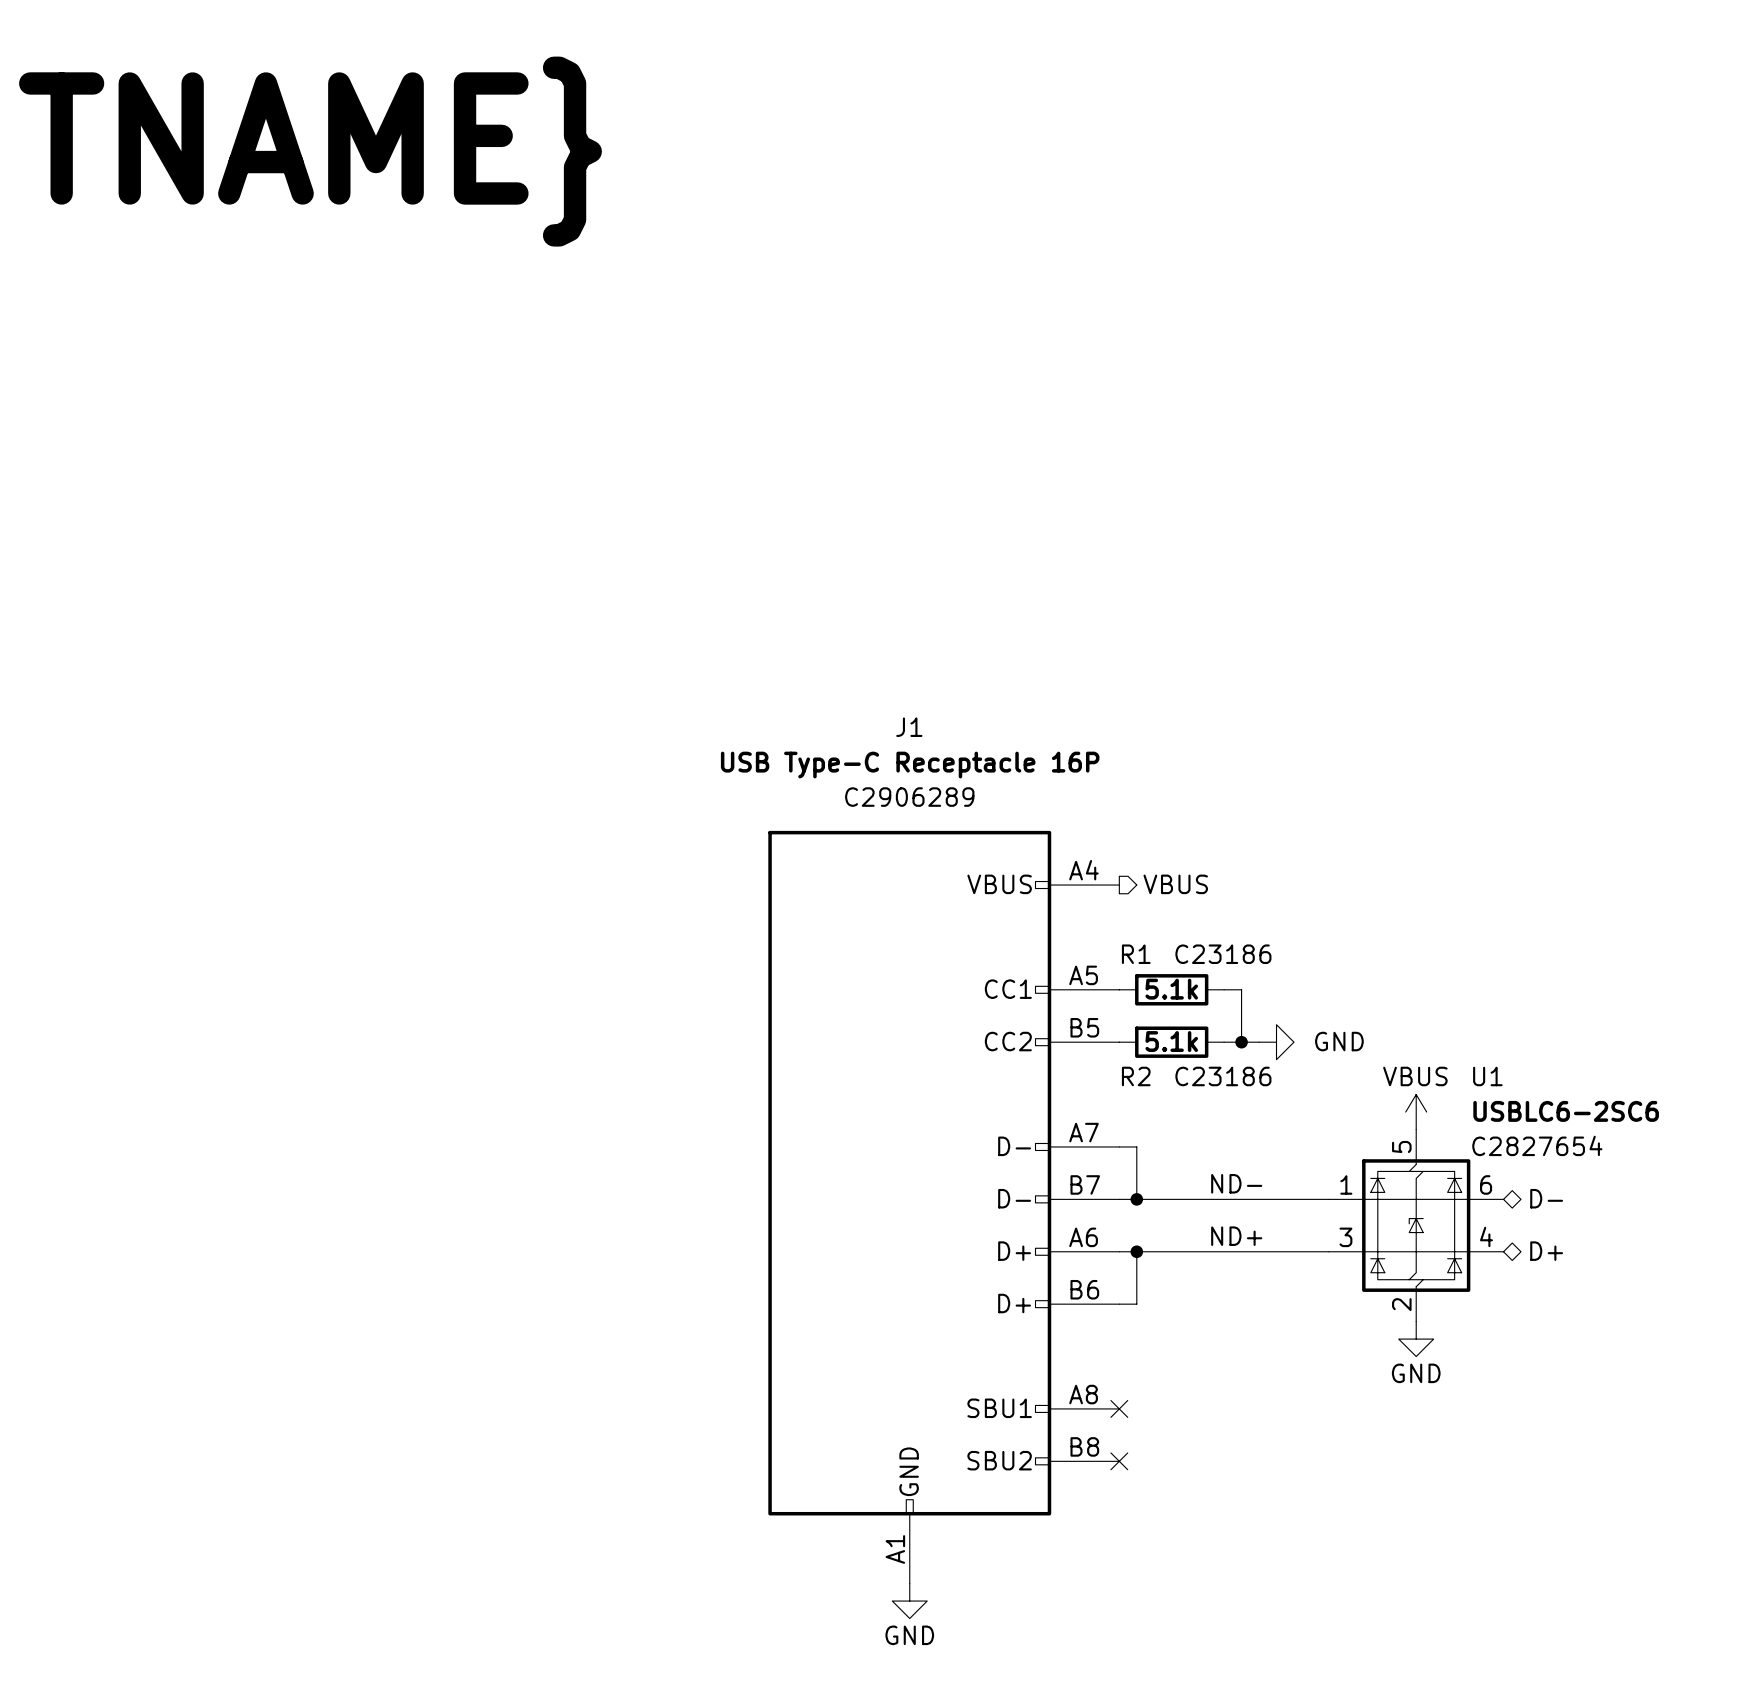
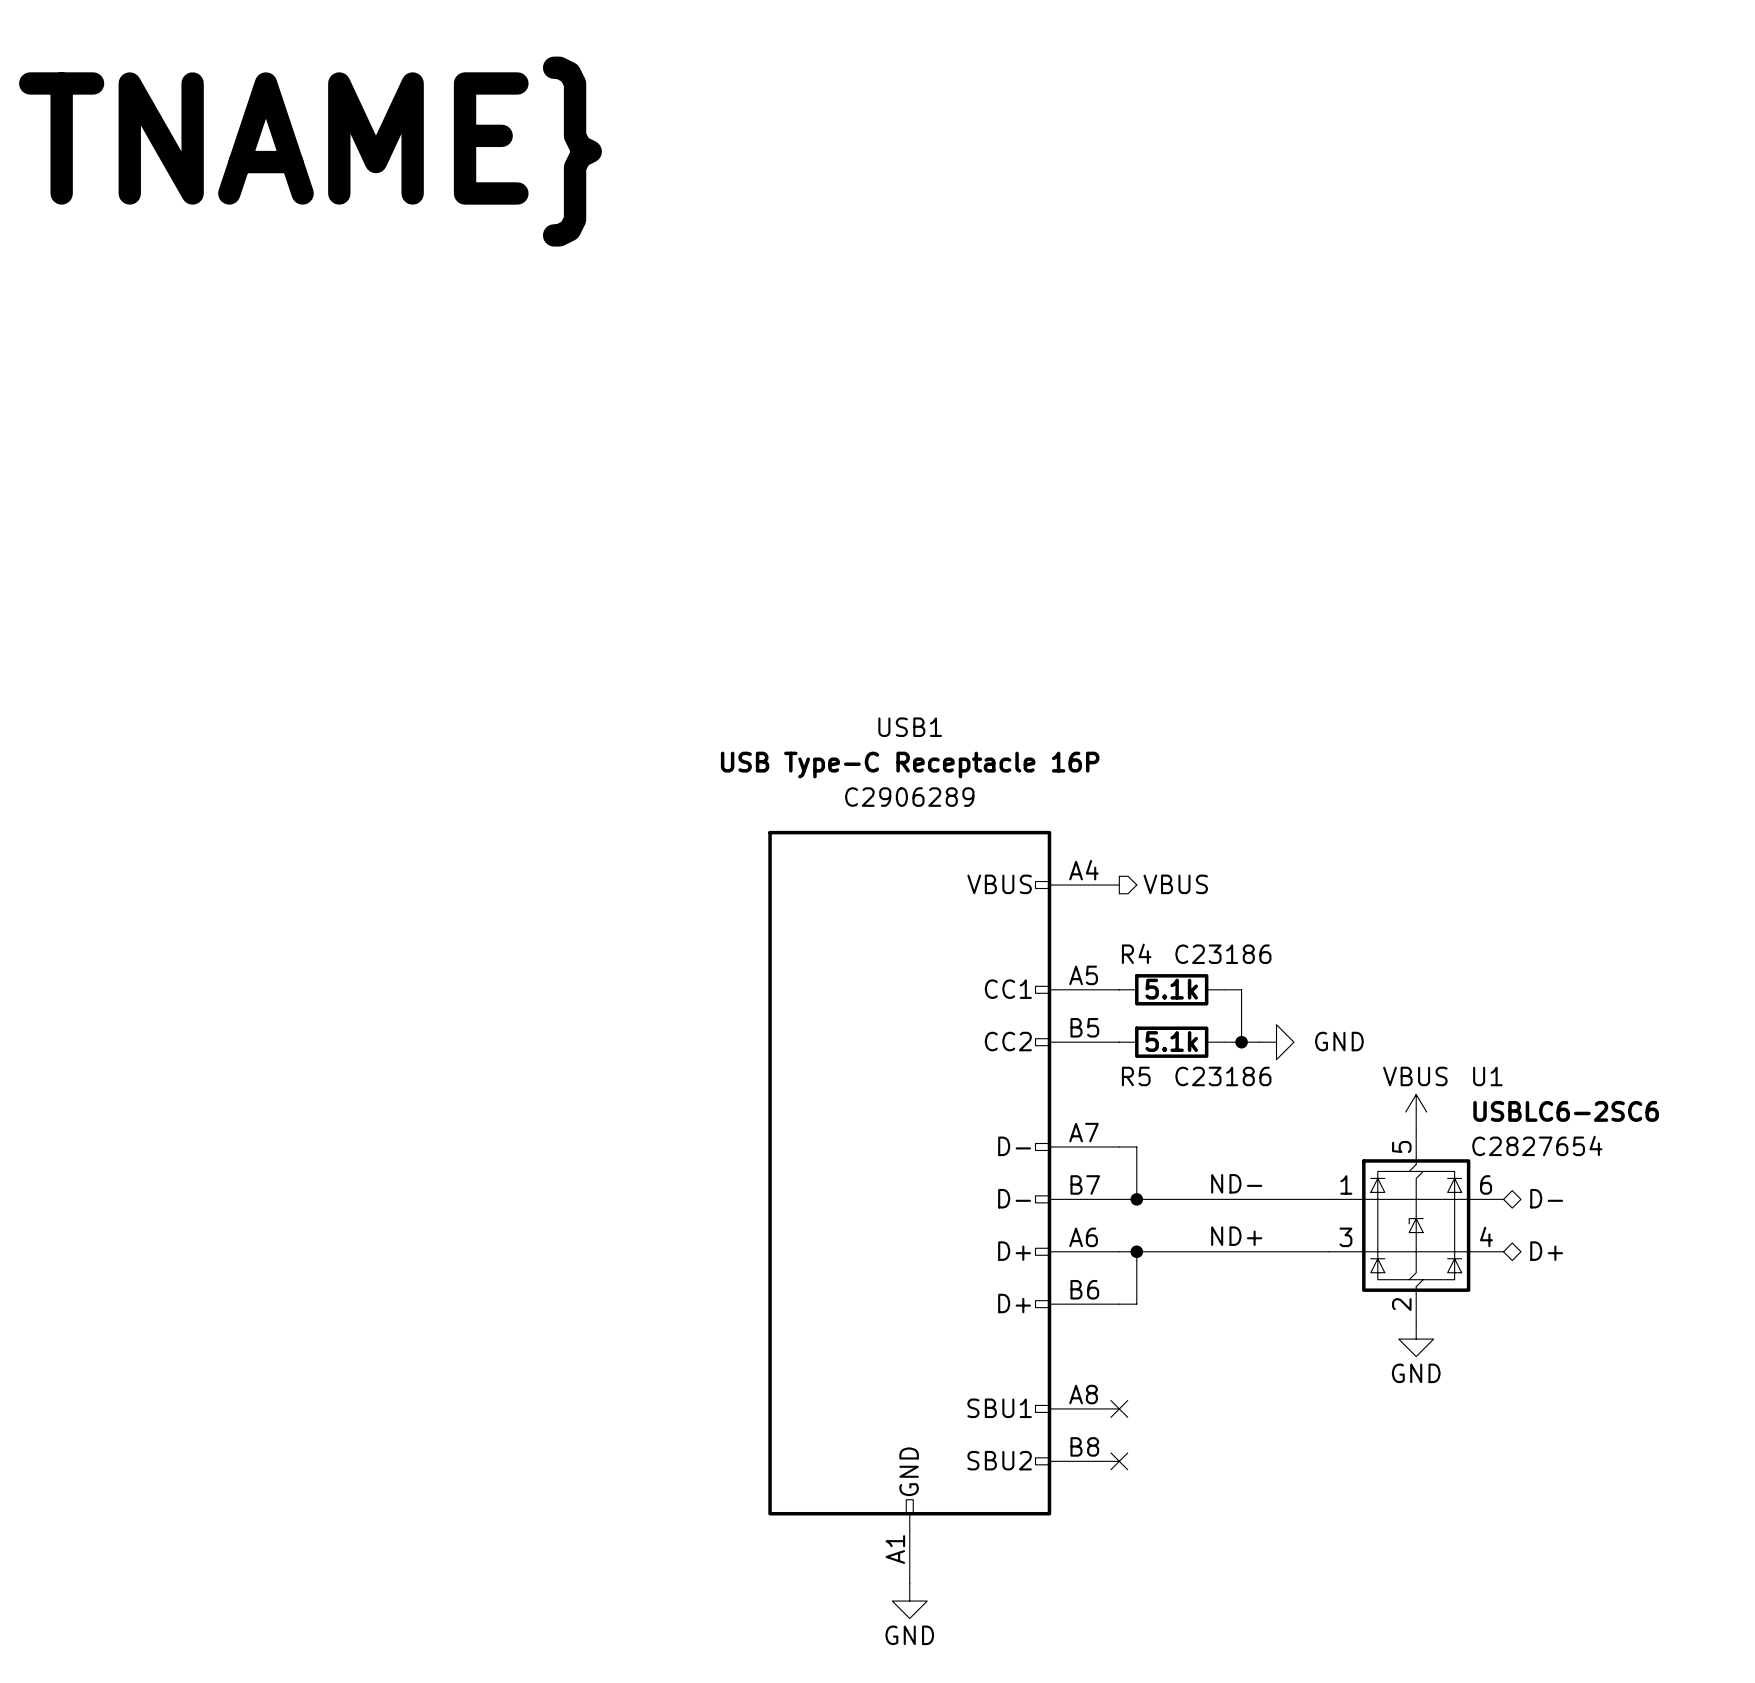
J1 name: J1 (909, 727) -> USB1 (910, 727)
R1 name: R1 (1136, 954) -> R4 (1136, 953)
R2 name: R2 (1136, 1076) -> R5 (1136, 1076)

